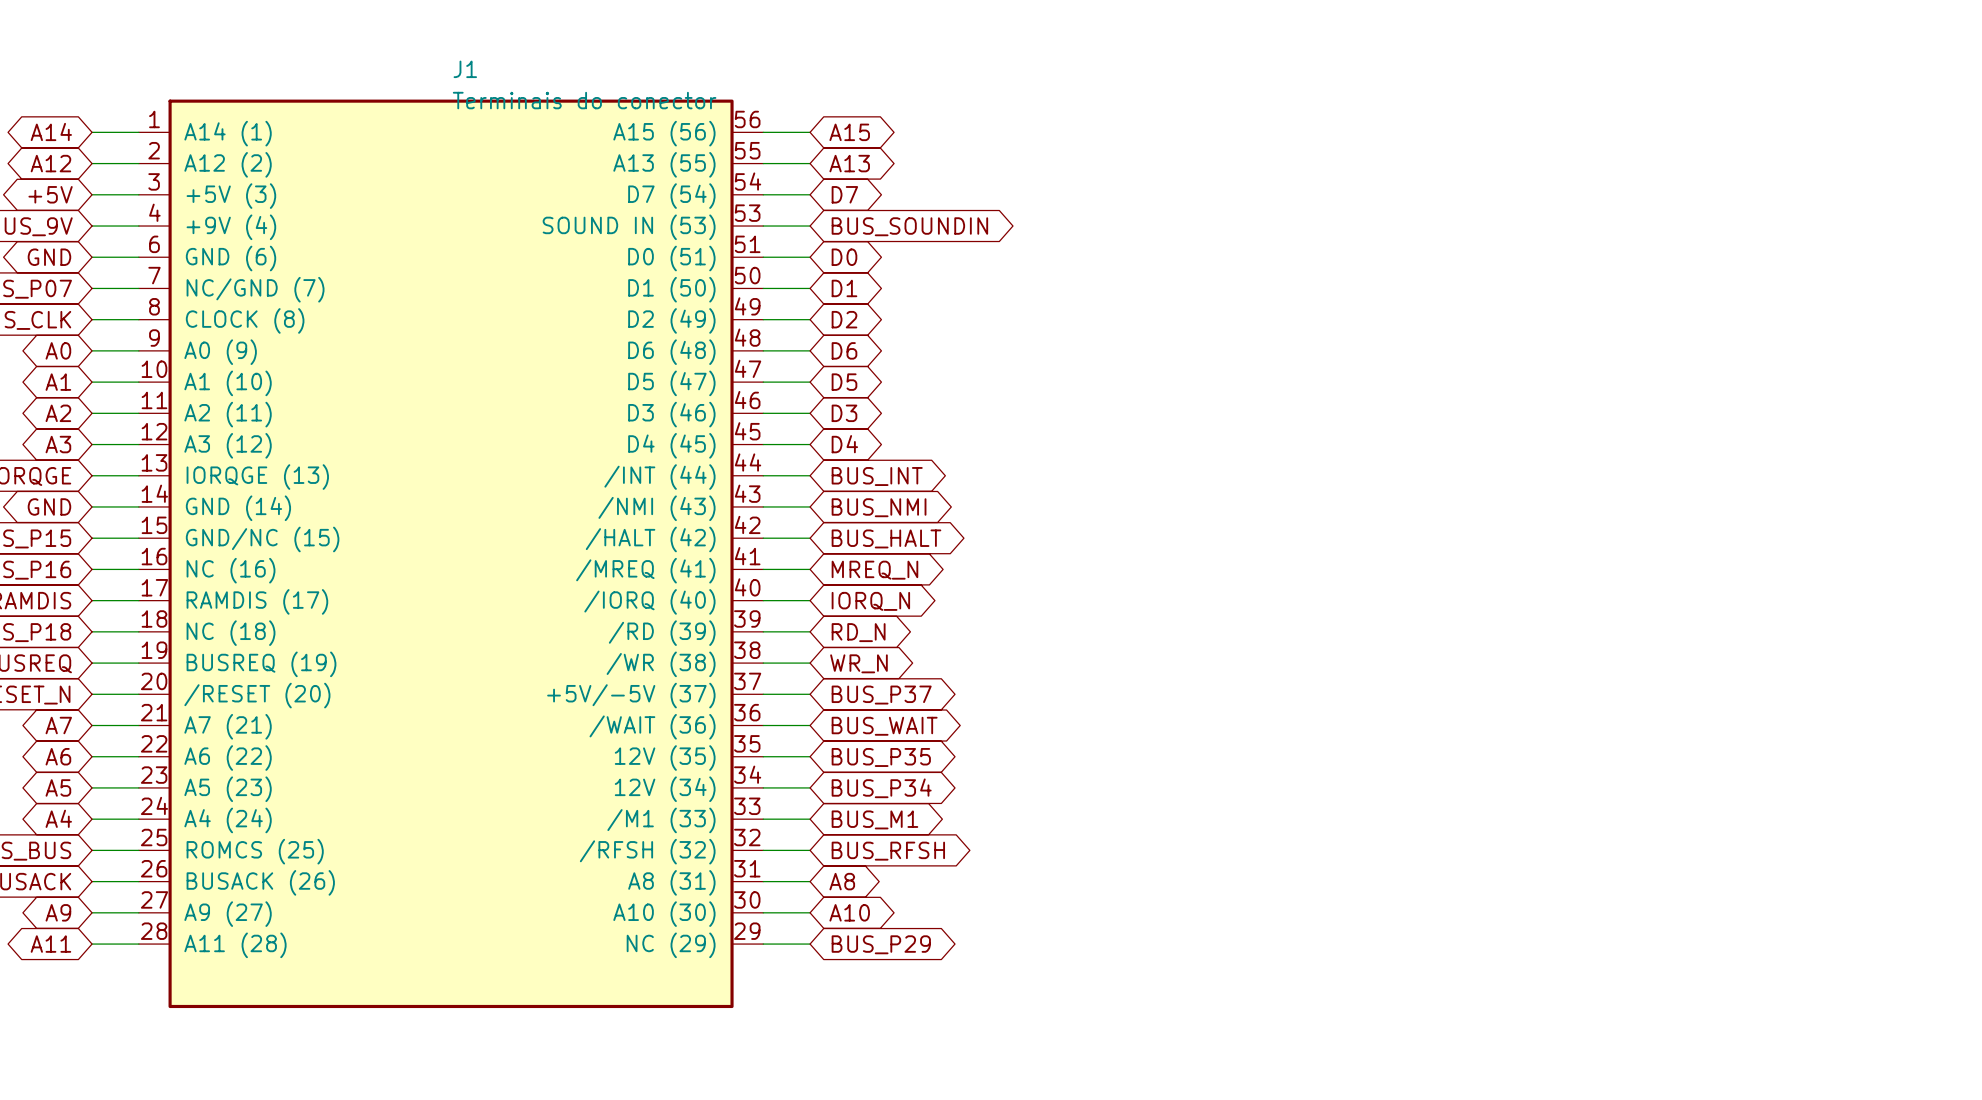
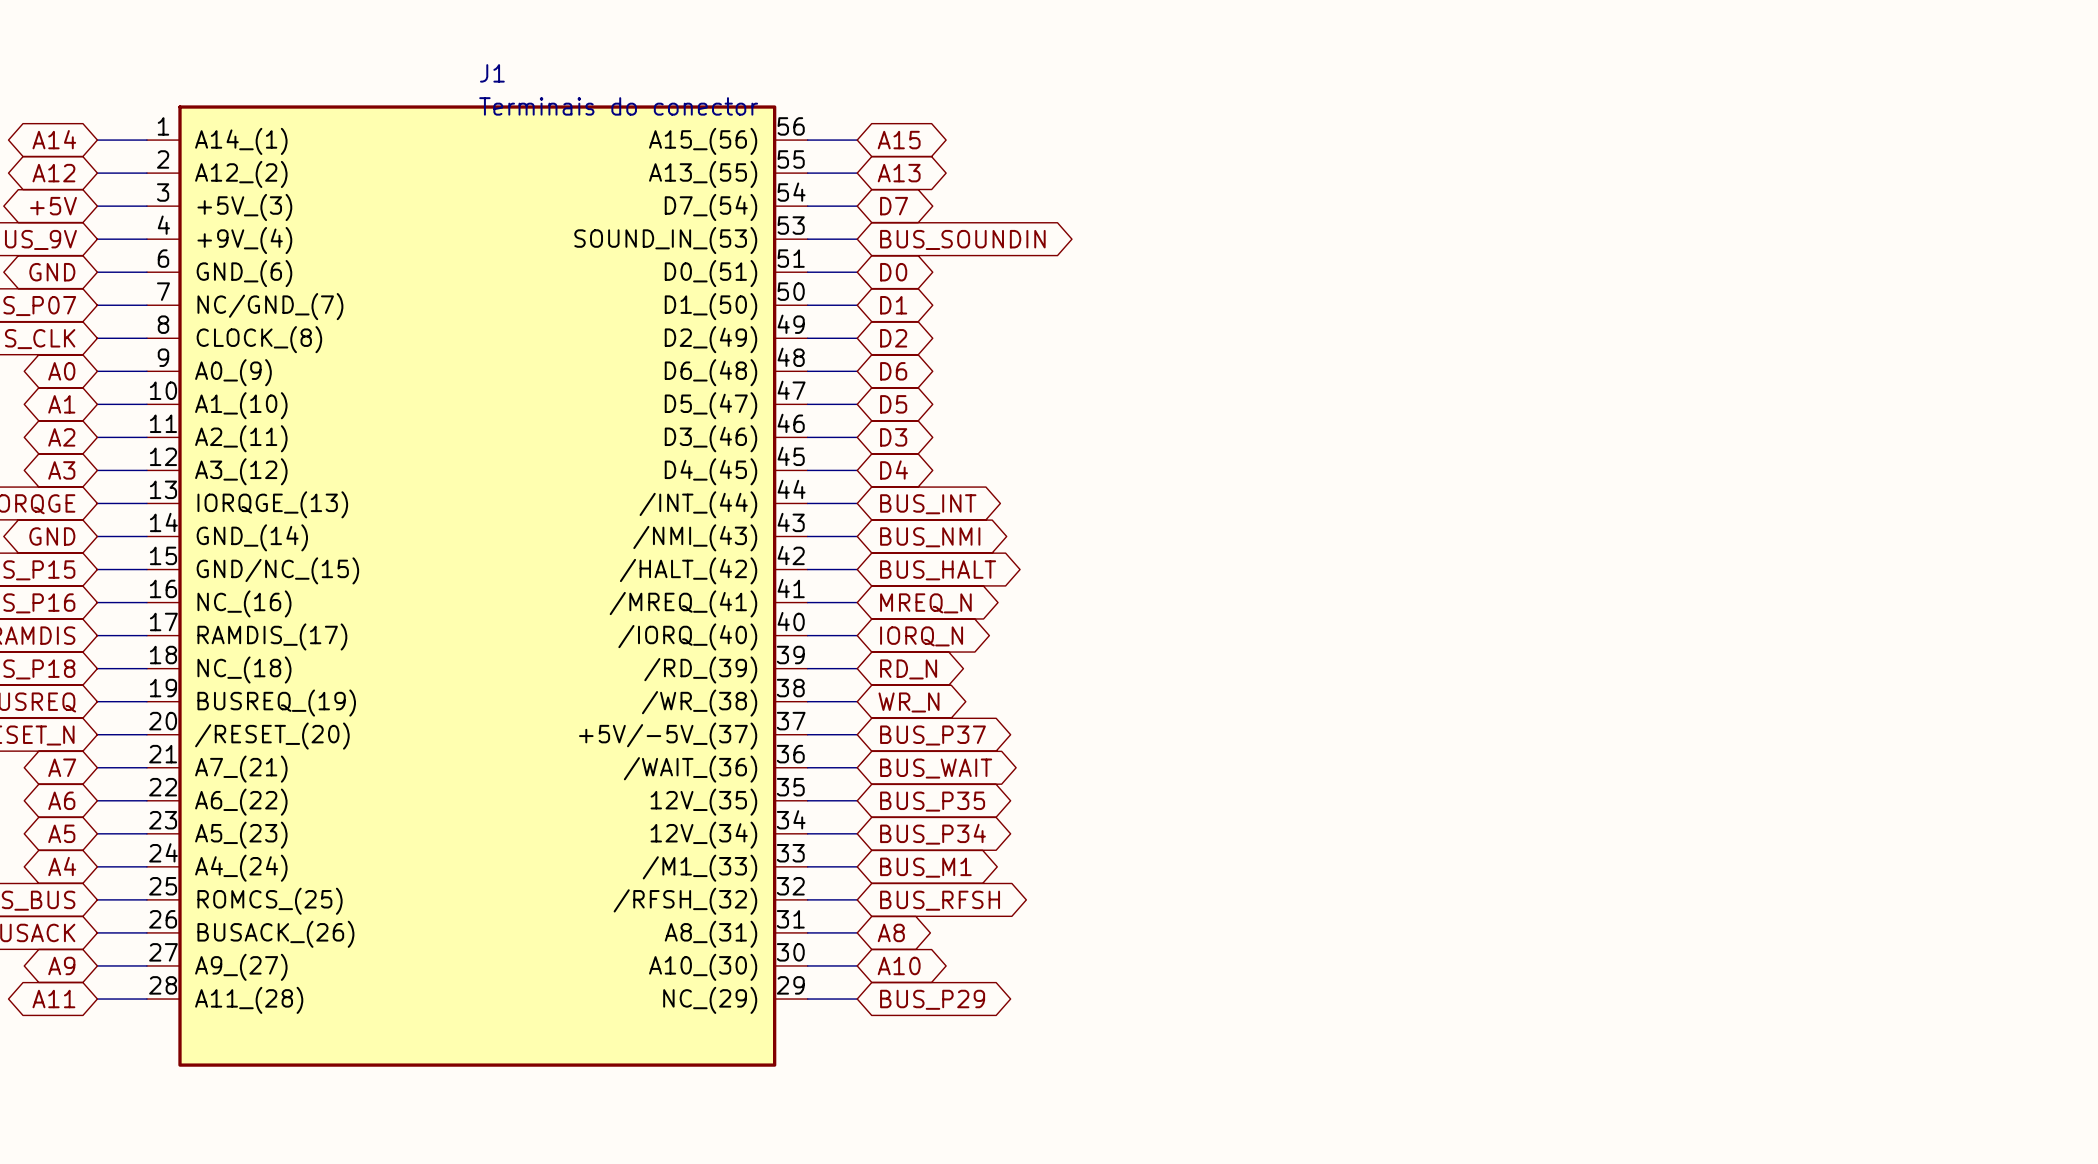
J1 symbol: [138, 99, 764, 1009] -> [146, 105, 808, 1067]

